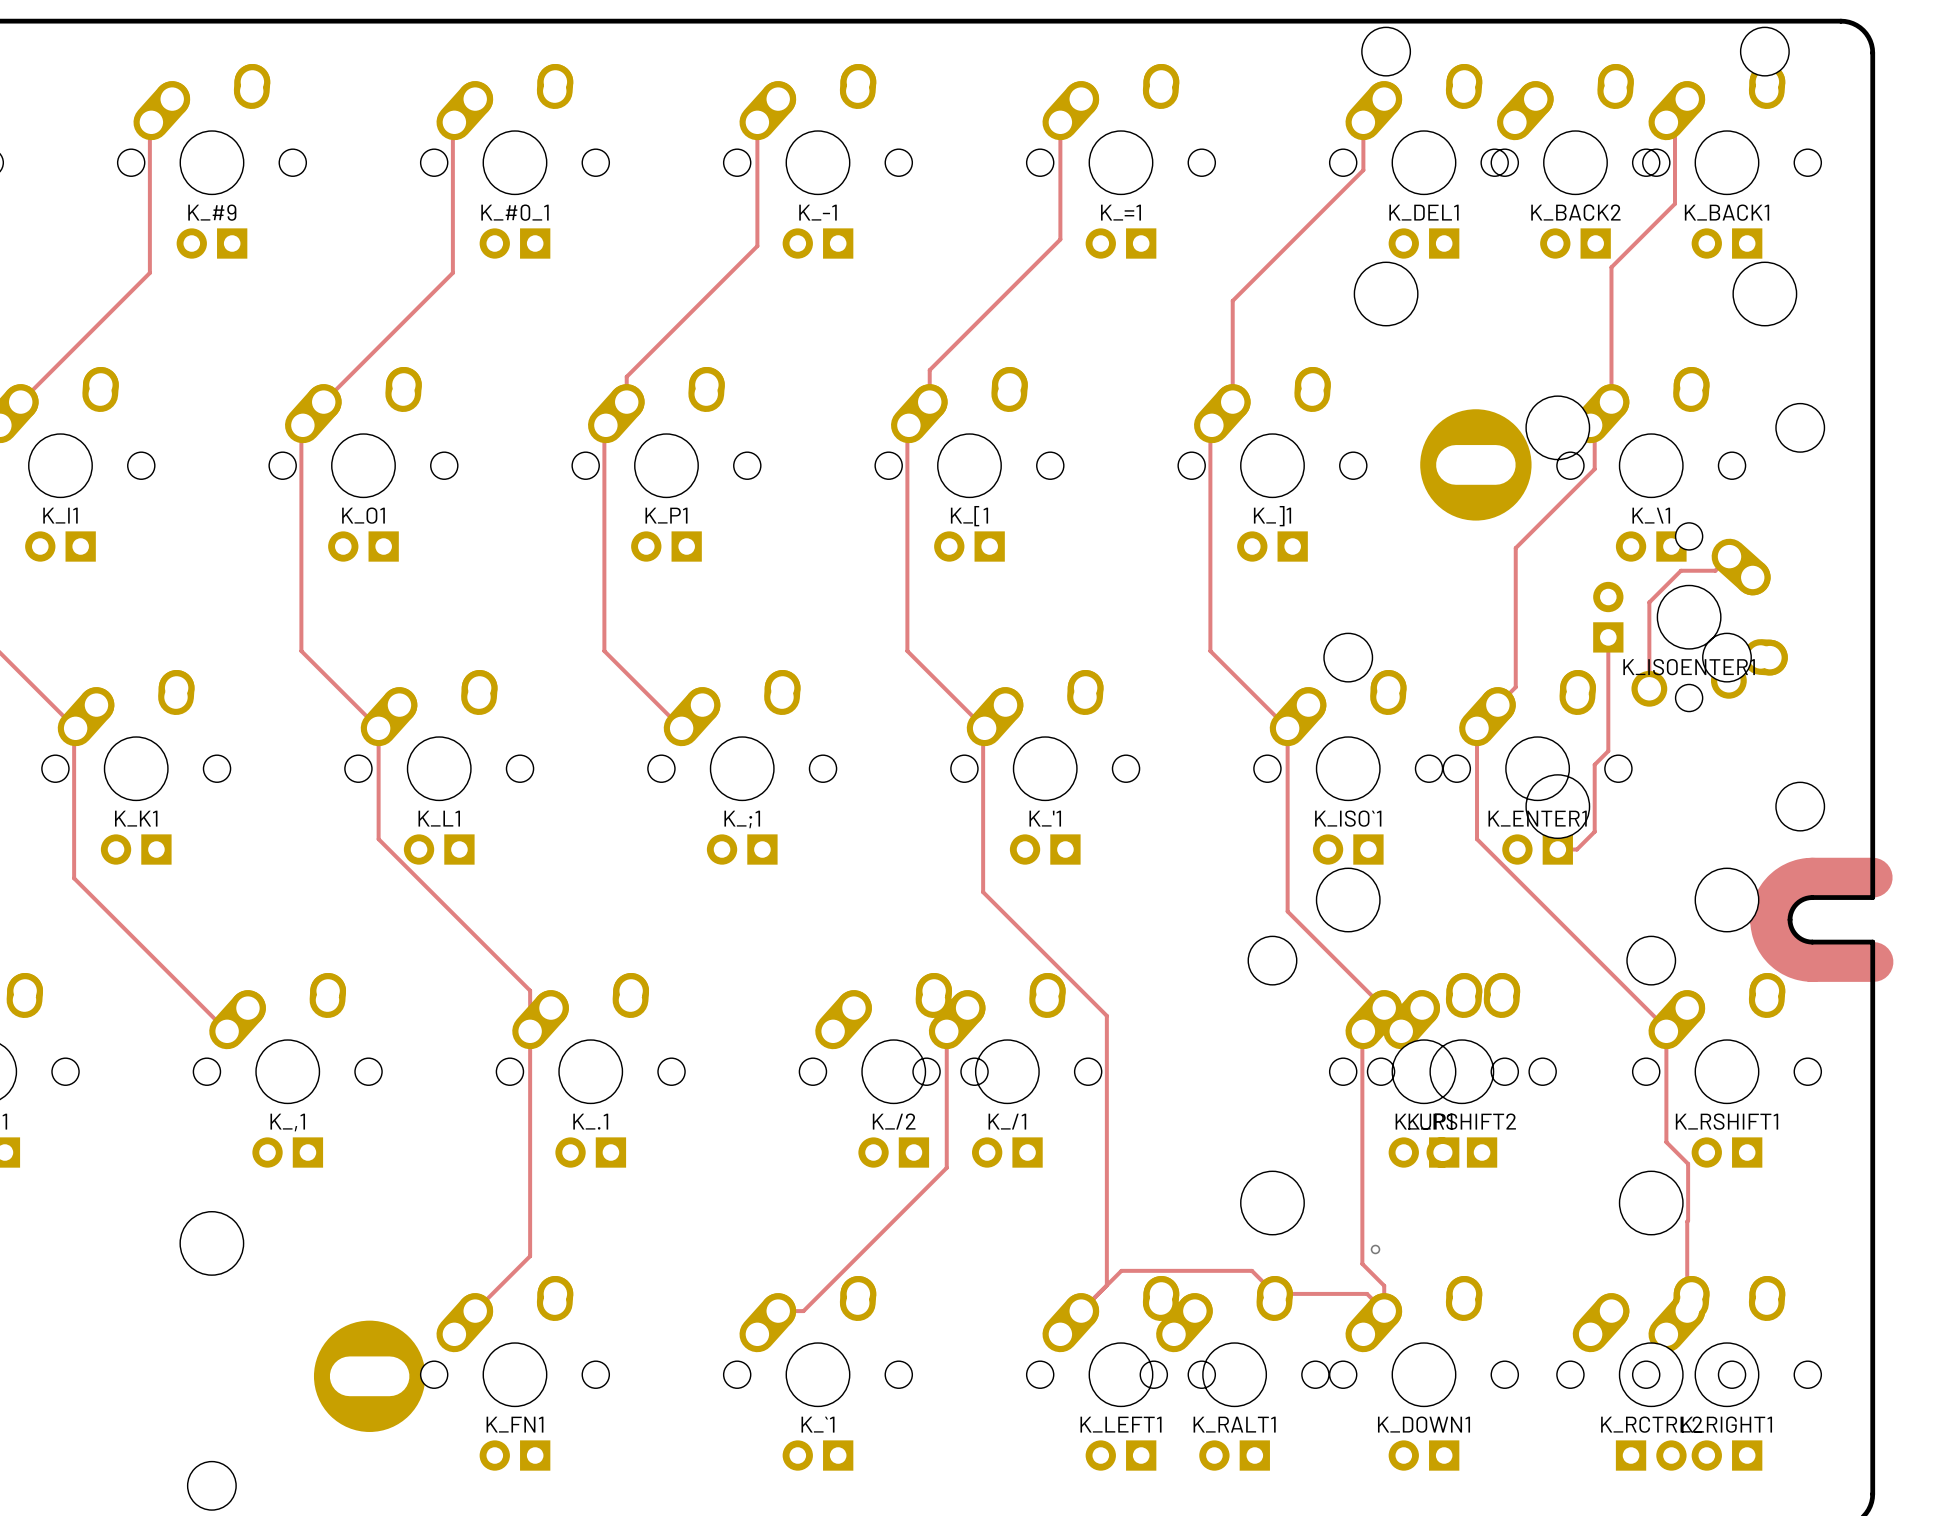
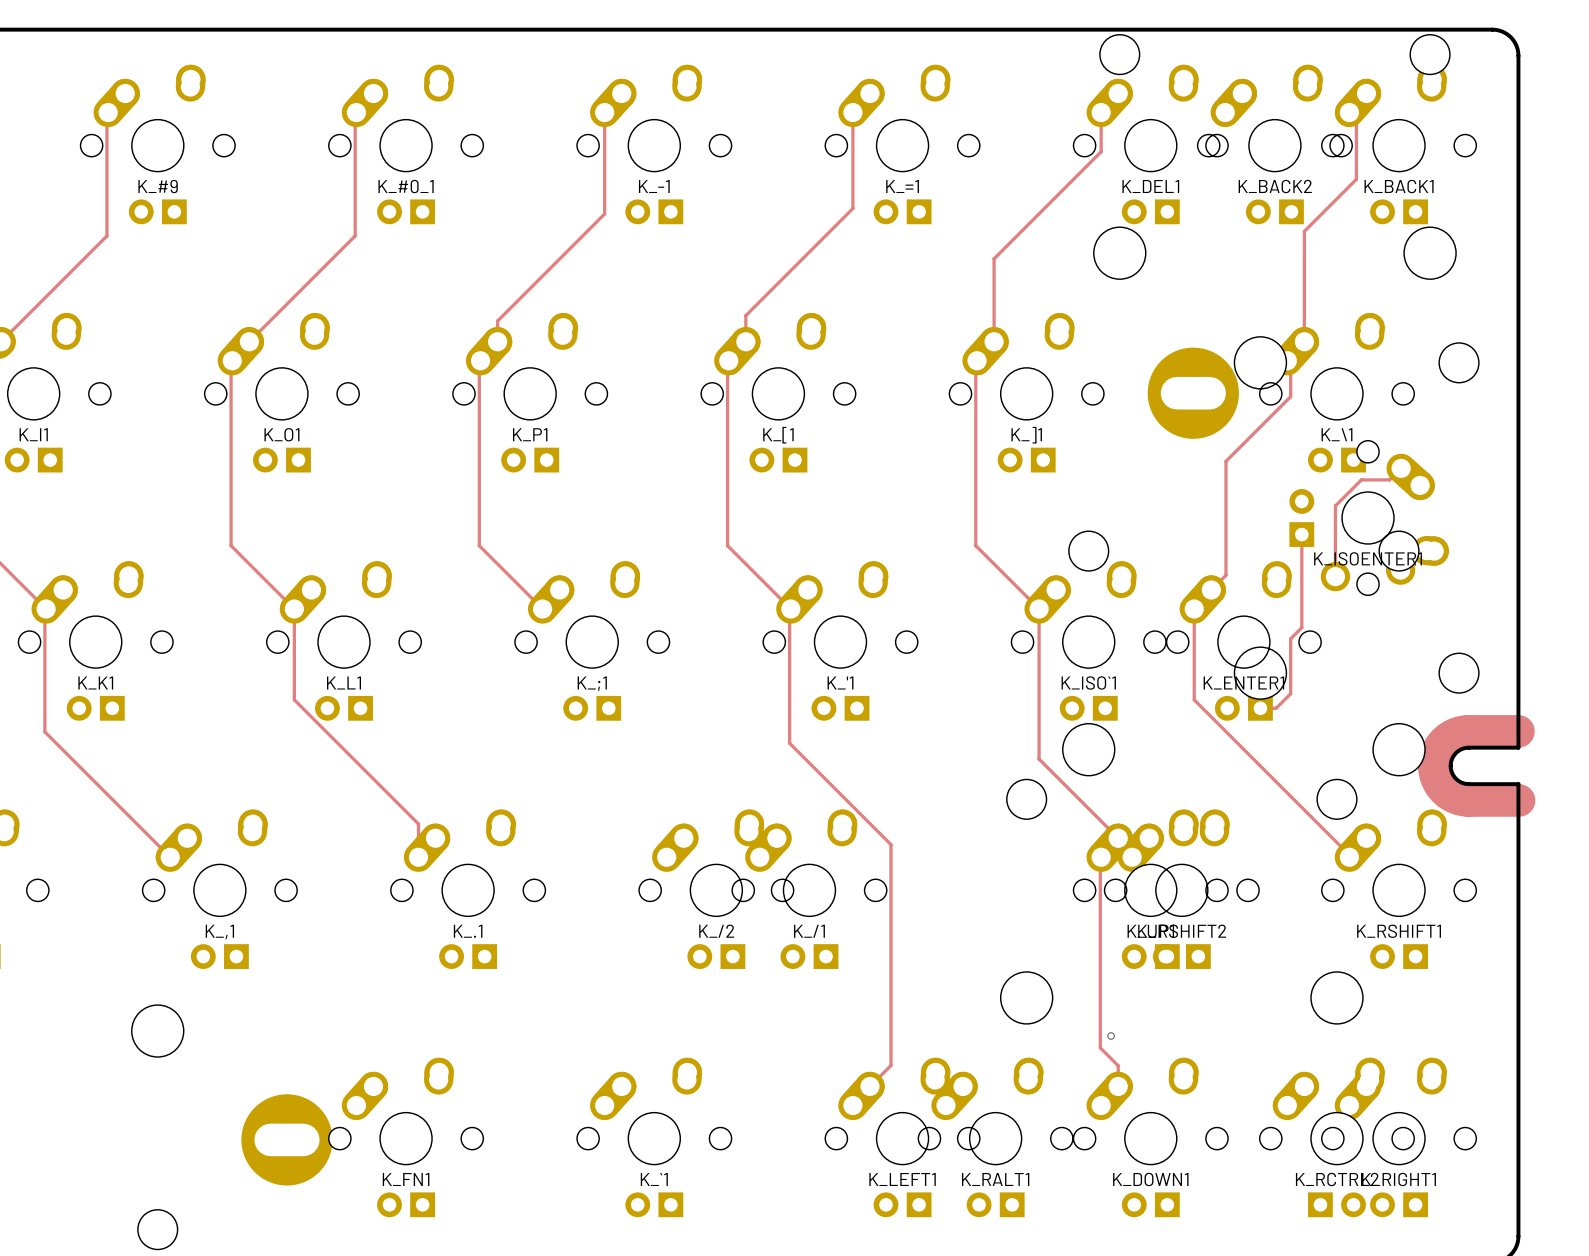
track: (530, 1031) (530, 1256) (475, 1311) -> none
track: (946, 1031) (946, 1167) (803, 1311) (778, 1311) -> none
track: (1666, 1031) (1666, 1142) (1688, 1163) (1687, 1311) -> none
track: (1106, 1285) (1121, 1270) (1251, 1270) (1275, 1293) (1367, 1293) (1384, 1311) -> none

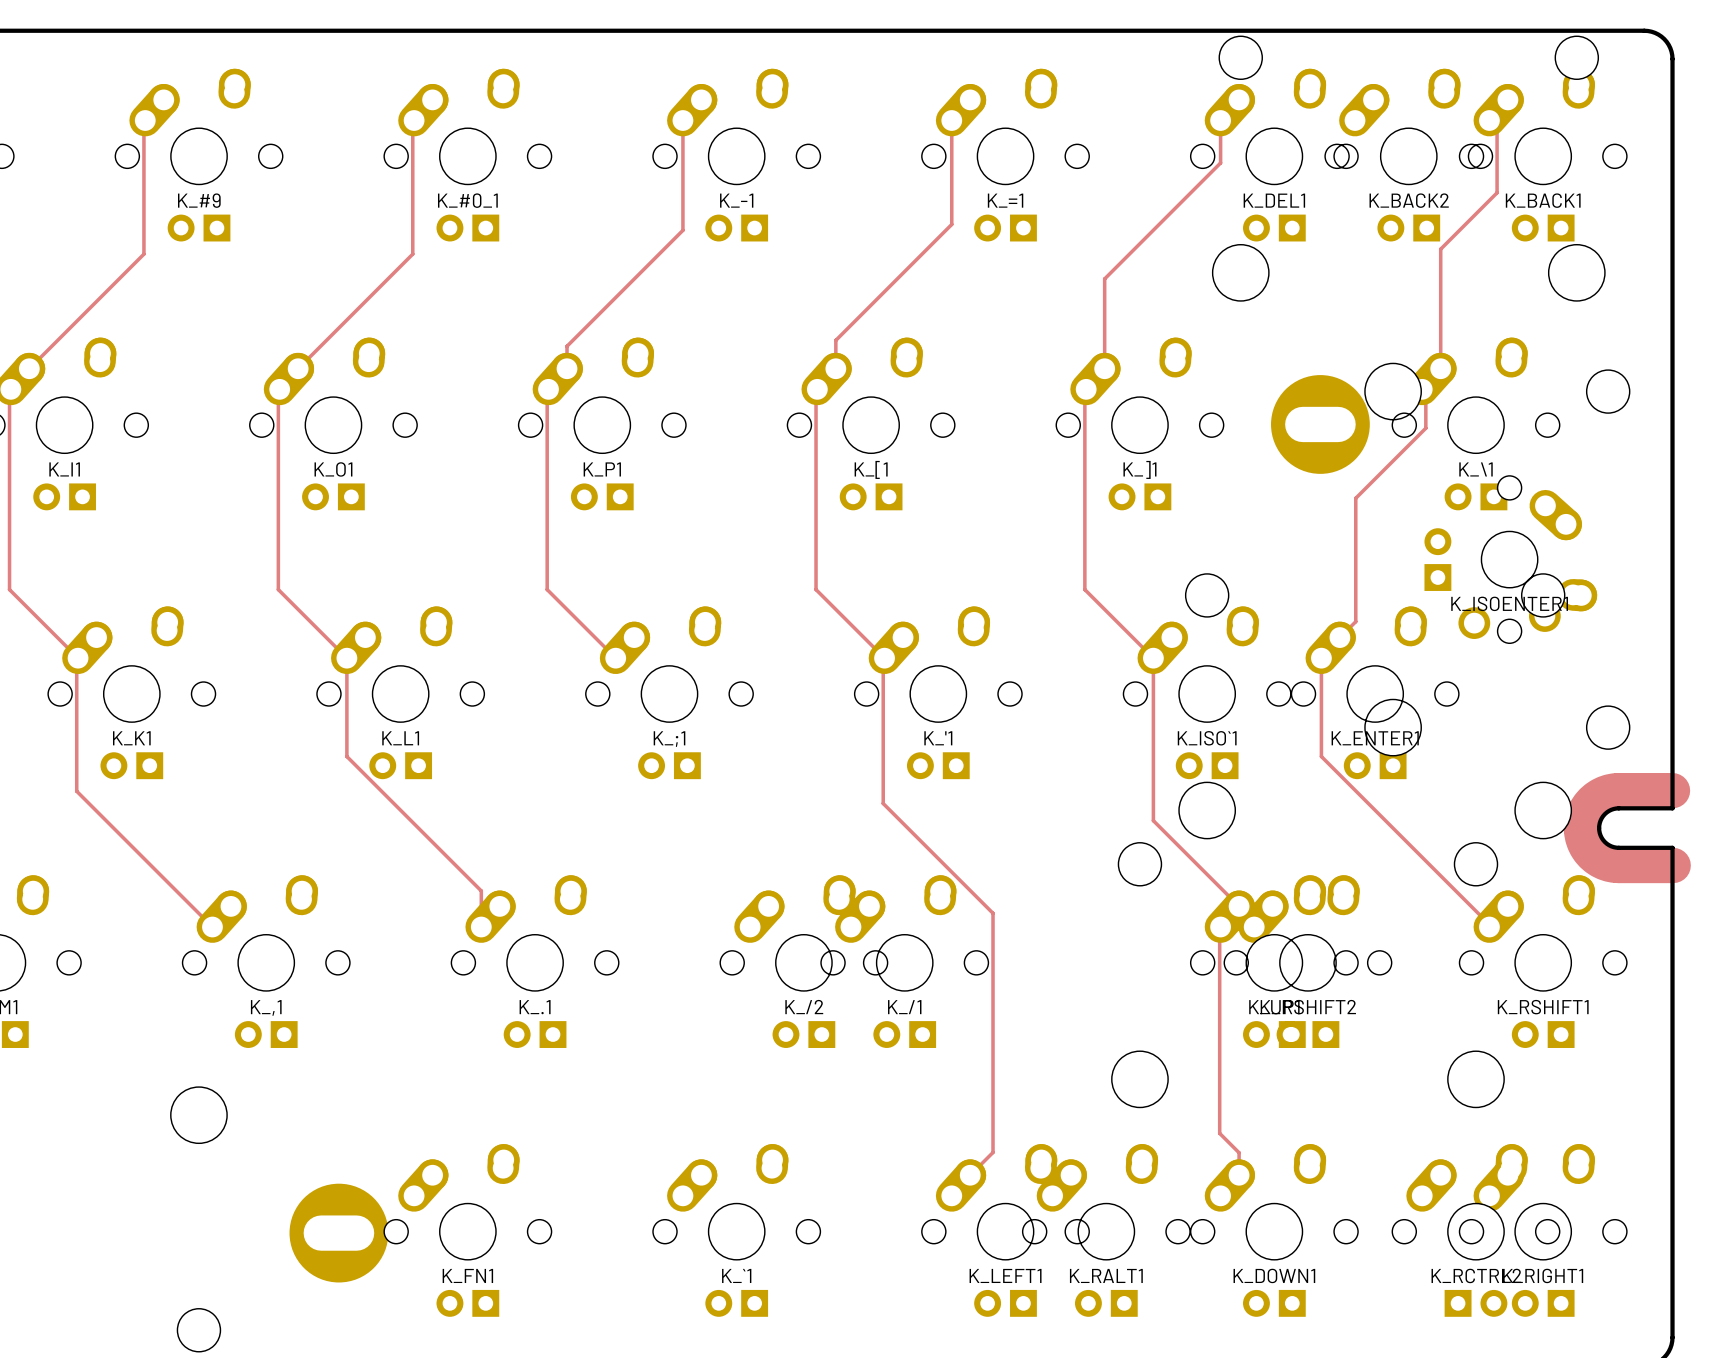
track: (1401, 468) (1389, 479) (1361, 479) (1335, 505) (1335, 576) -> none
track: (1301, 534) (1301, 627) (1290, 638) (1290, 693) (1276, 708) (1260, 708) -> none
via: (1111, 1036) -> none

